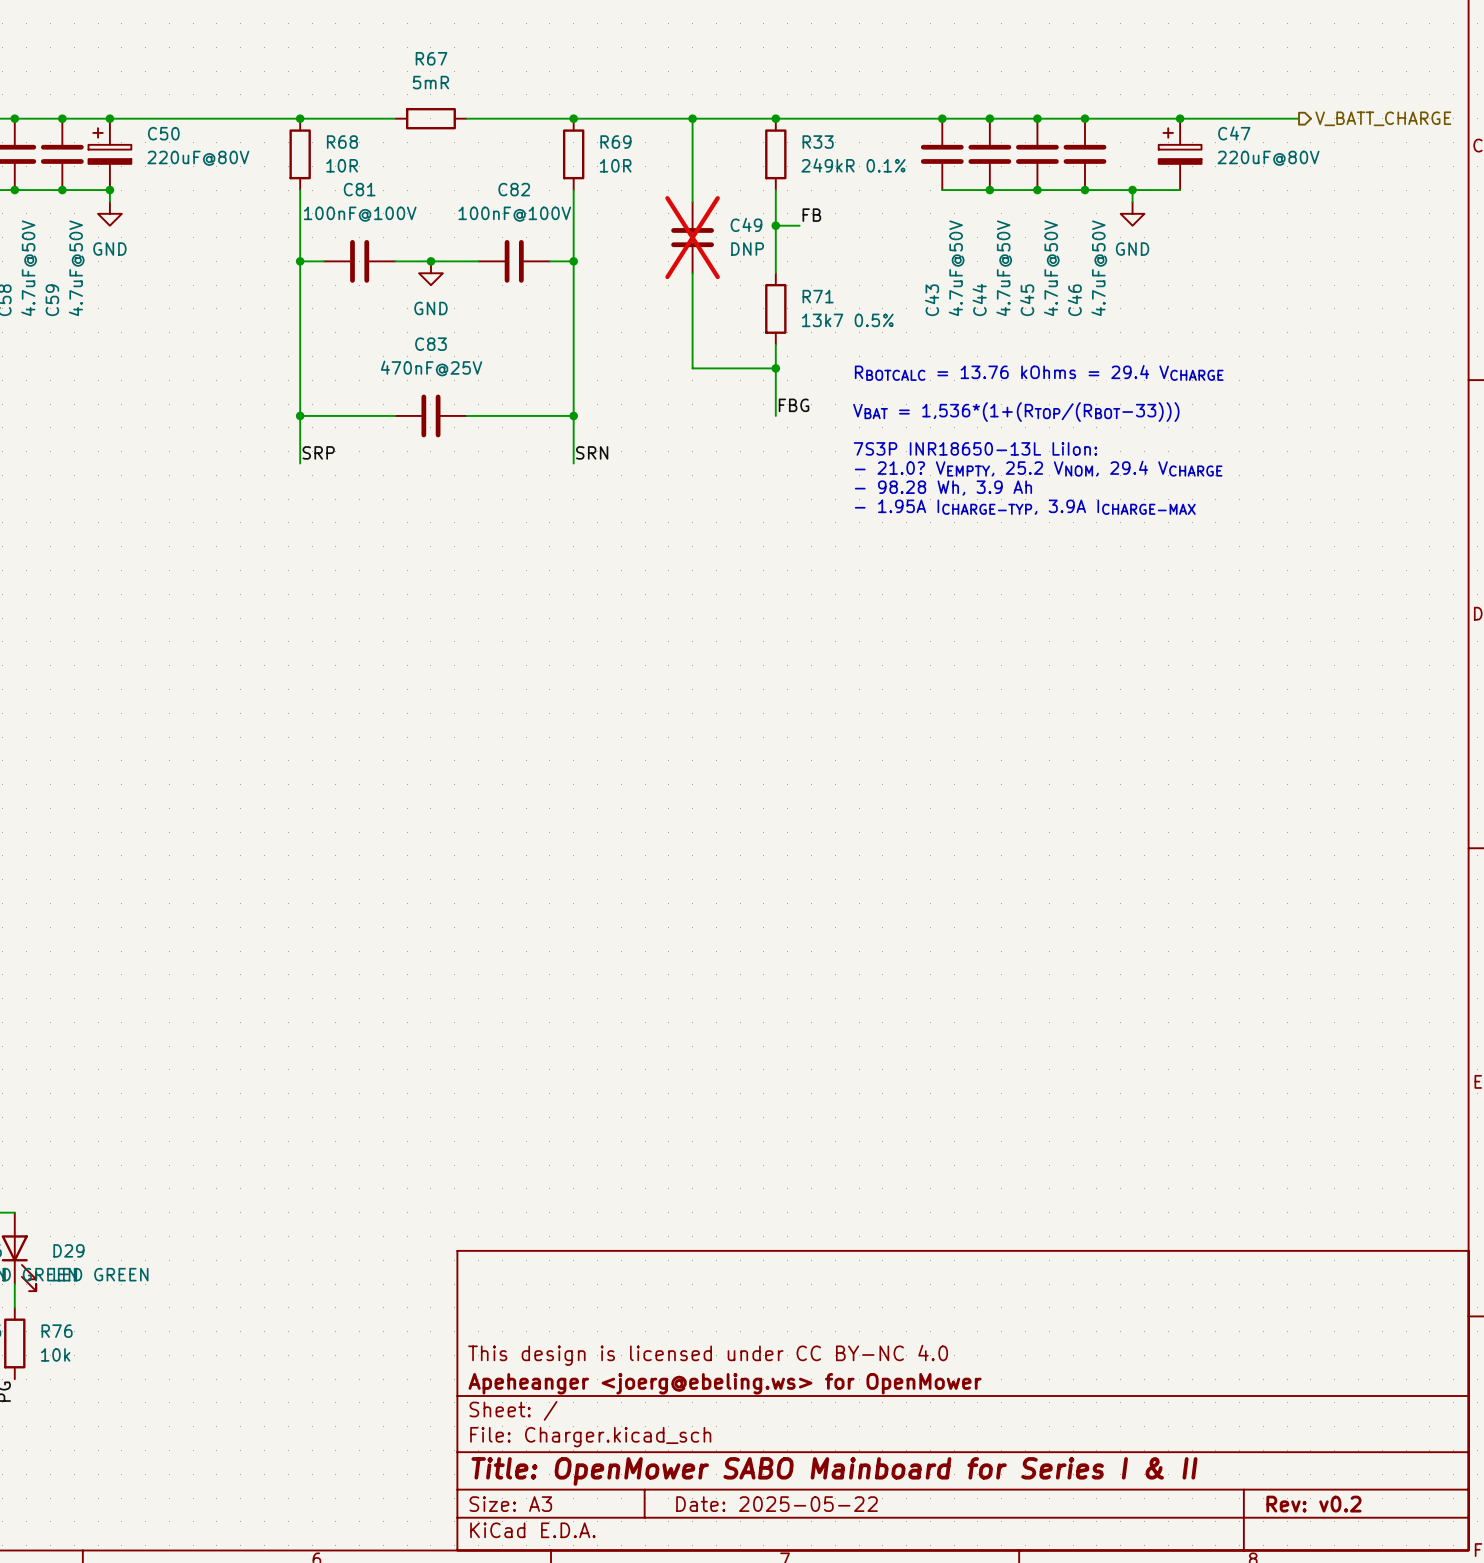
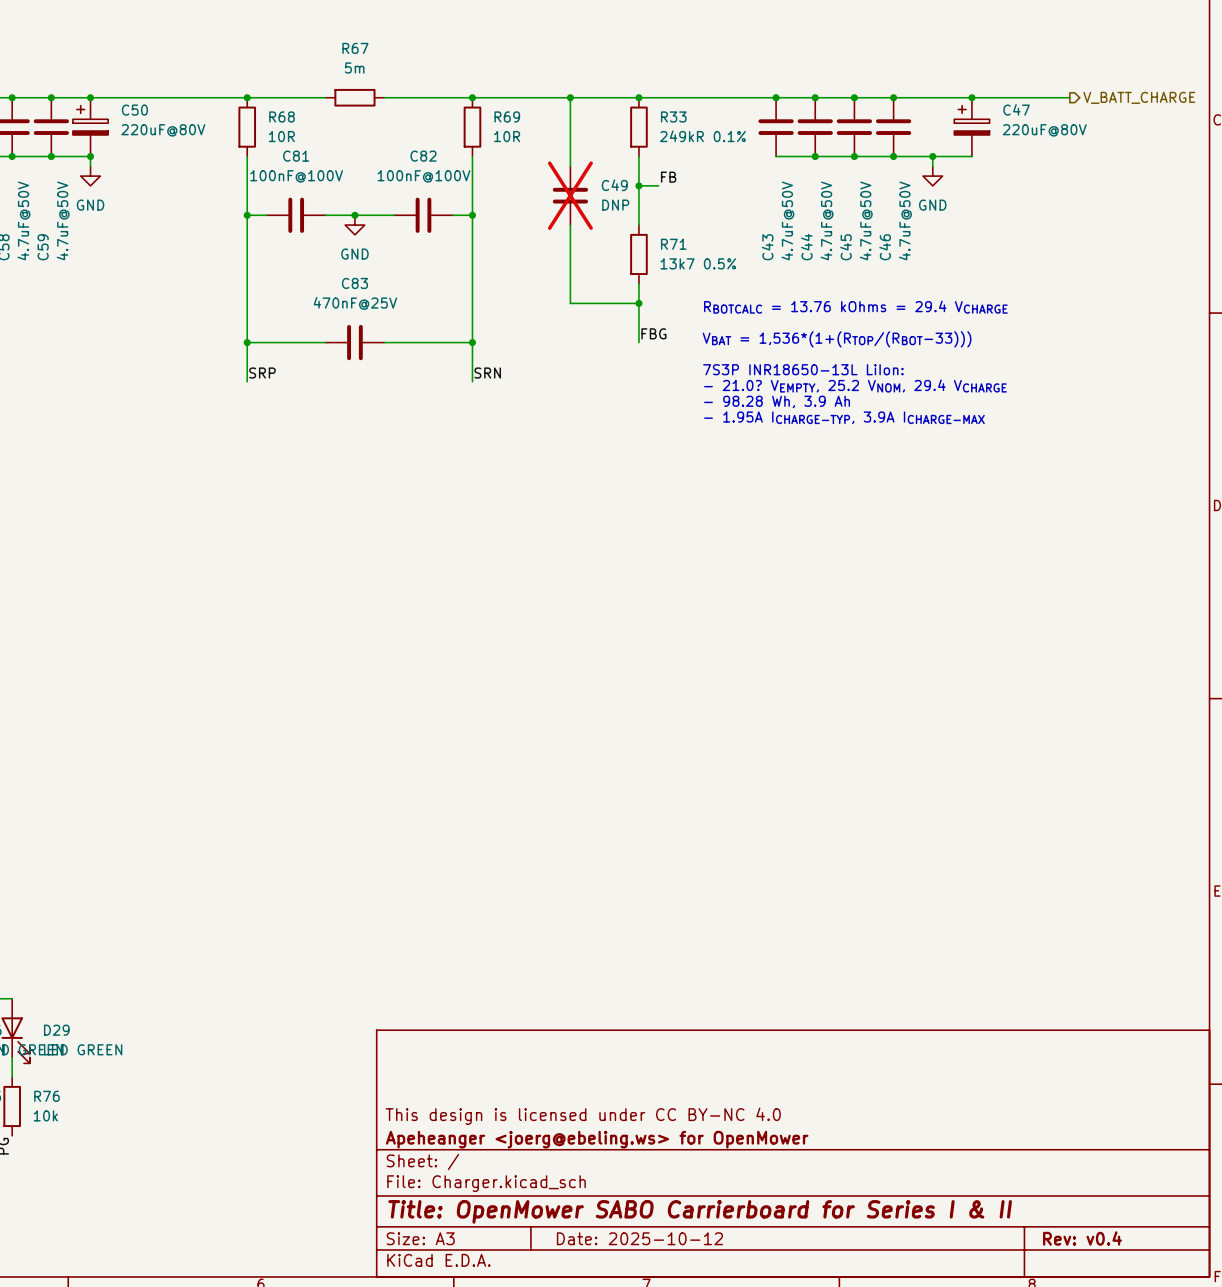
R67 value: 5mR (430, 82) -> 5m (354, 68)
title block: Title: OpenMower SABO Mainboard for Series I & II (834, 1471) -> Title: OpenMower SABO Carrierboard for Series I & II (700, 1211)
title block: Date: 2025-05-22 (777, 1504) -> Date: 2025-10-12 (639, 1238)
title block: Rev: v0.2 (1313, 1504) -> Rev: v0.4 (1082, 1238)

